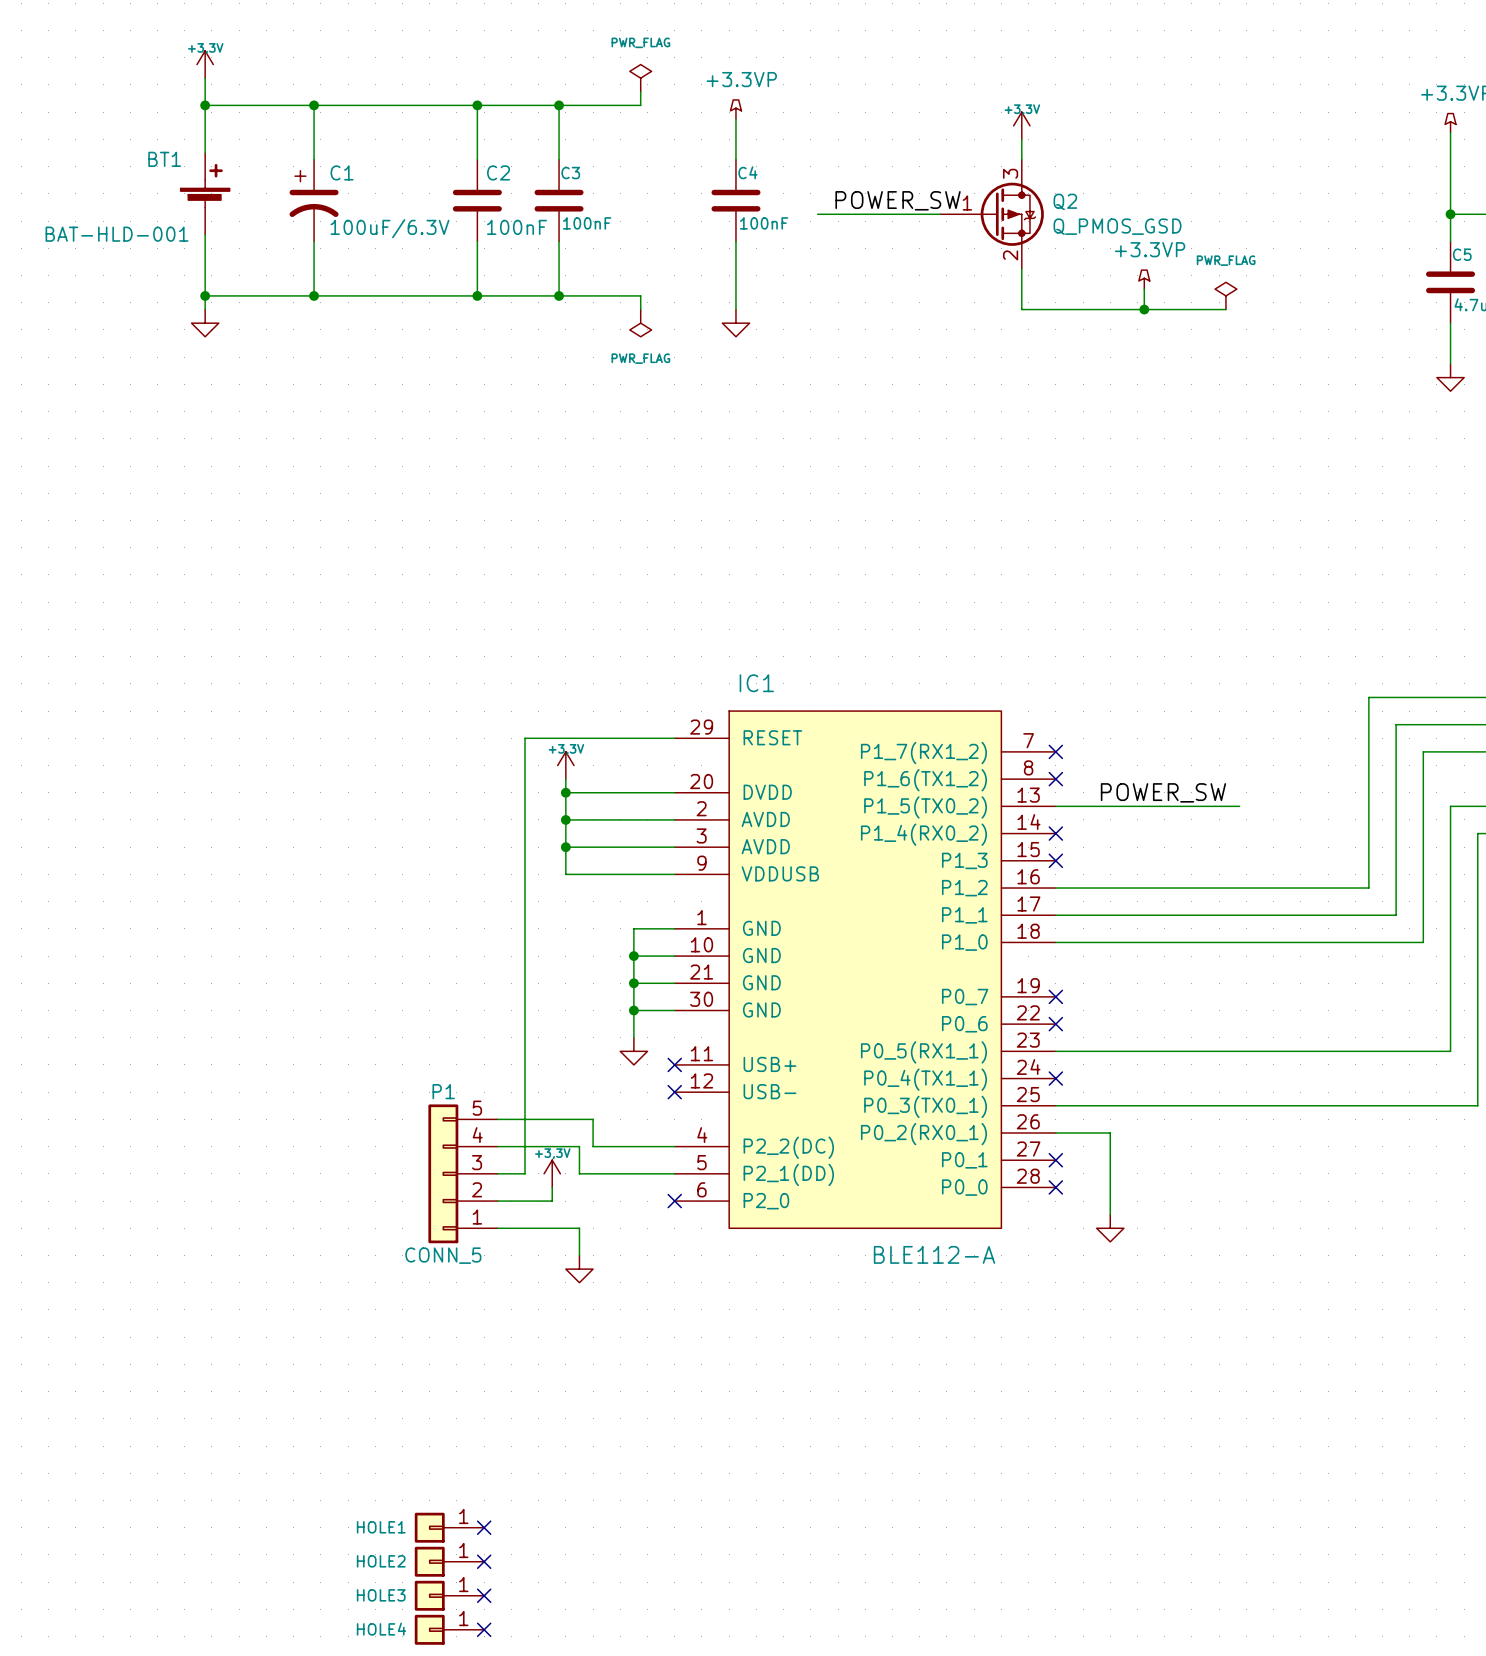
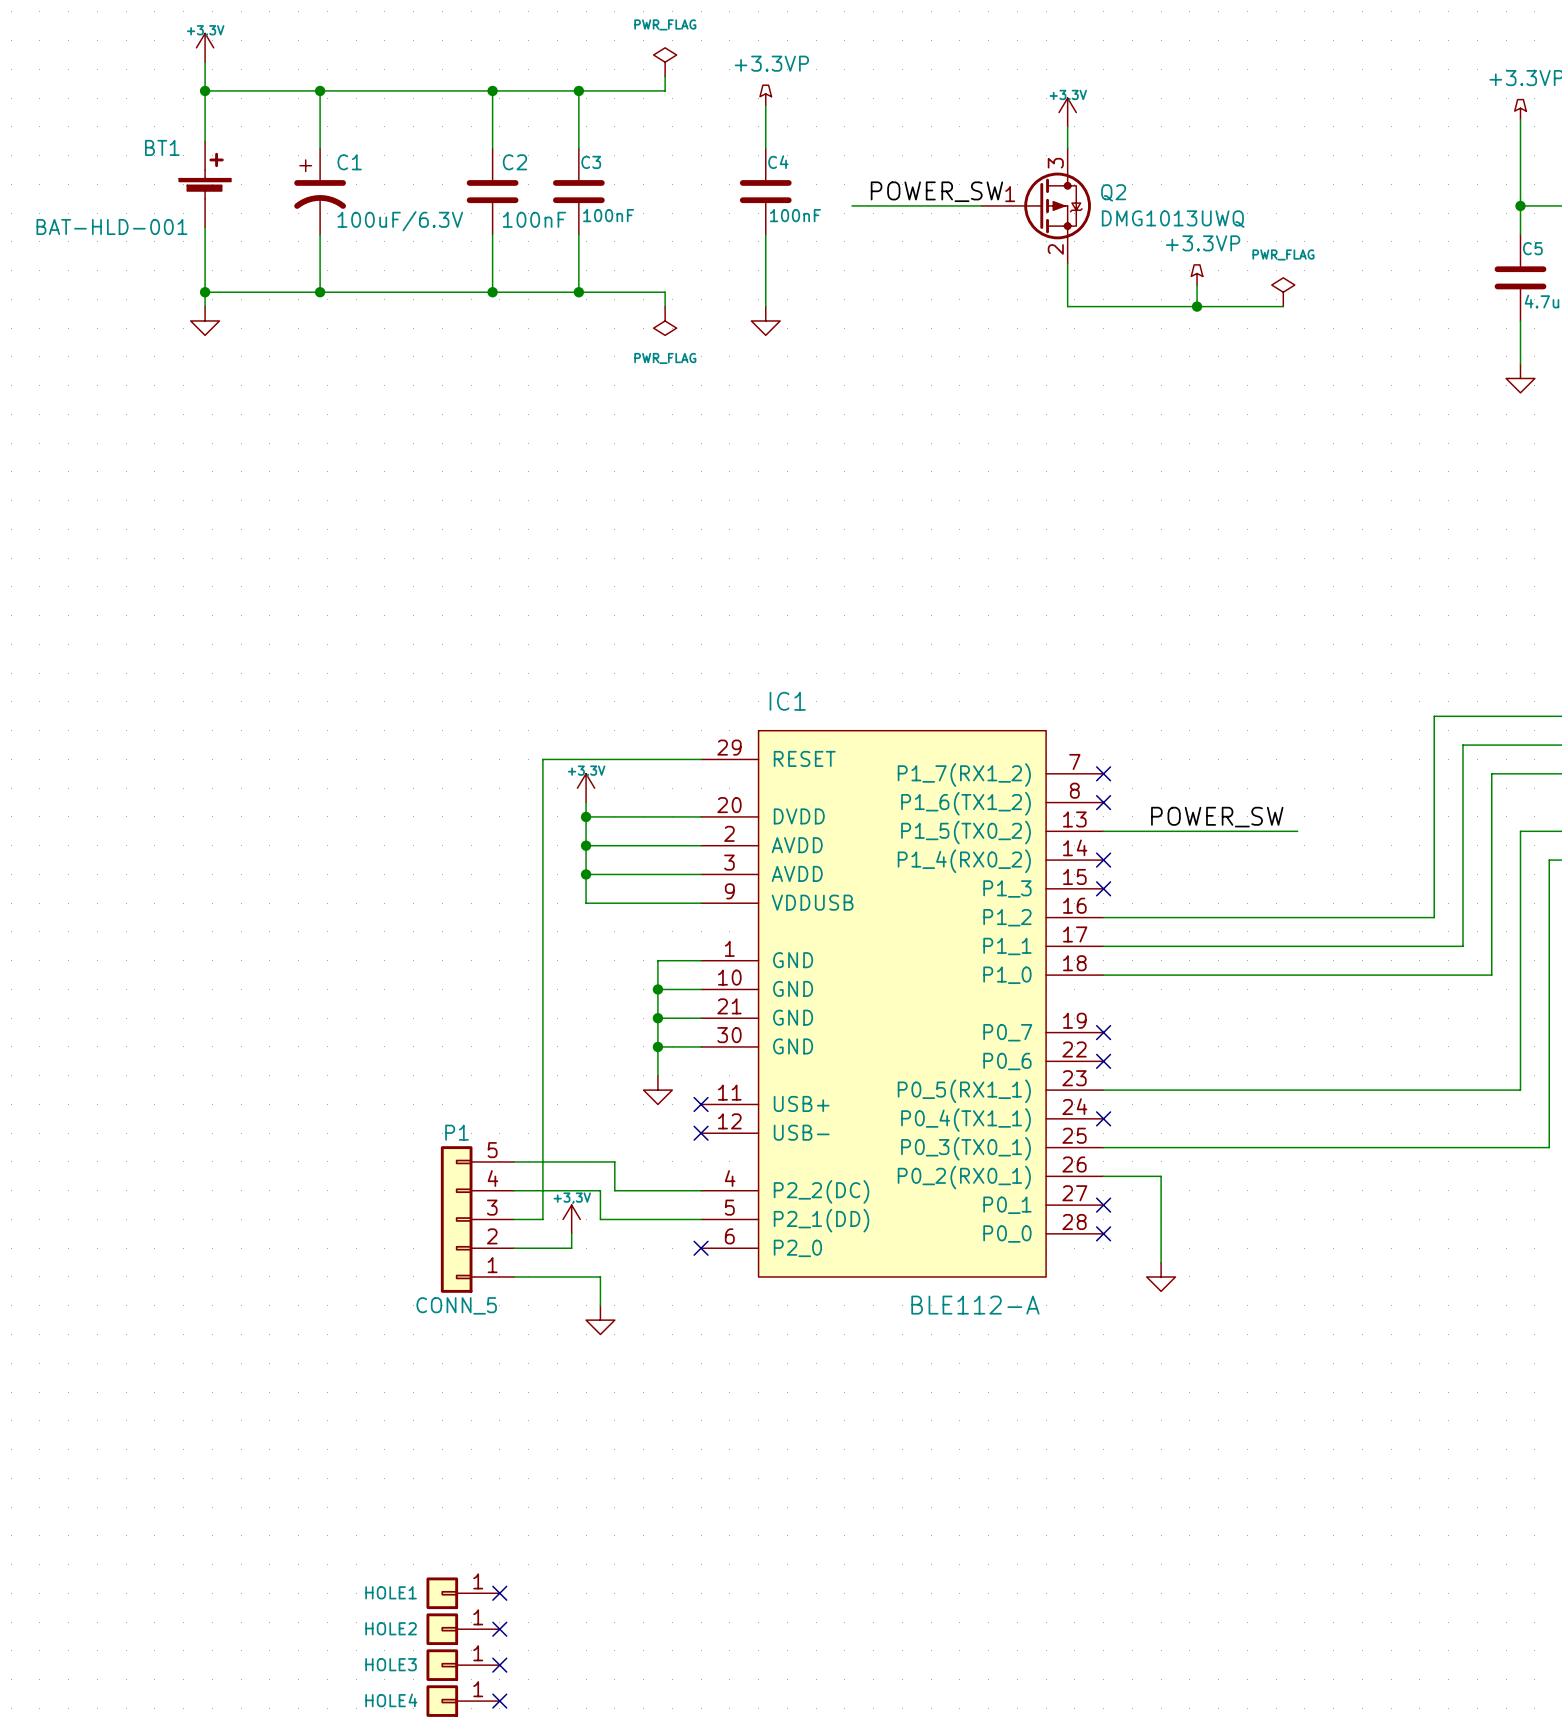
Q2 value: Q_PMOS_GSD (1117, 226) -> DMG1013UWQ (1173, 219)

